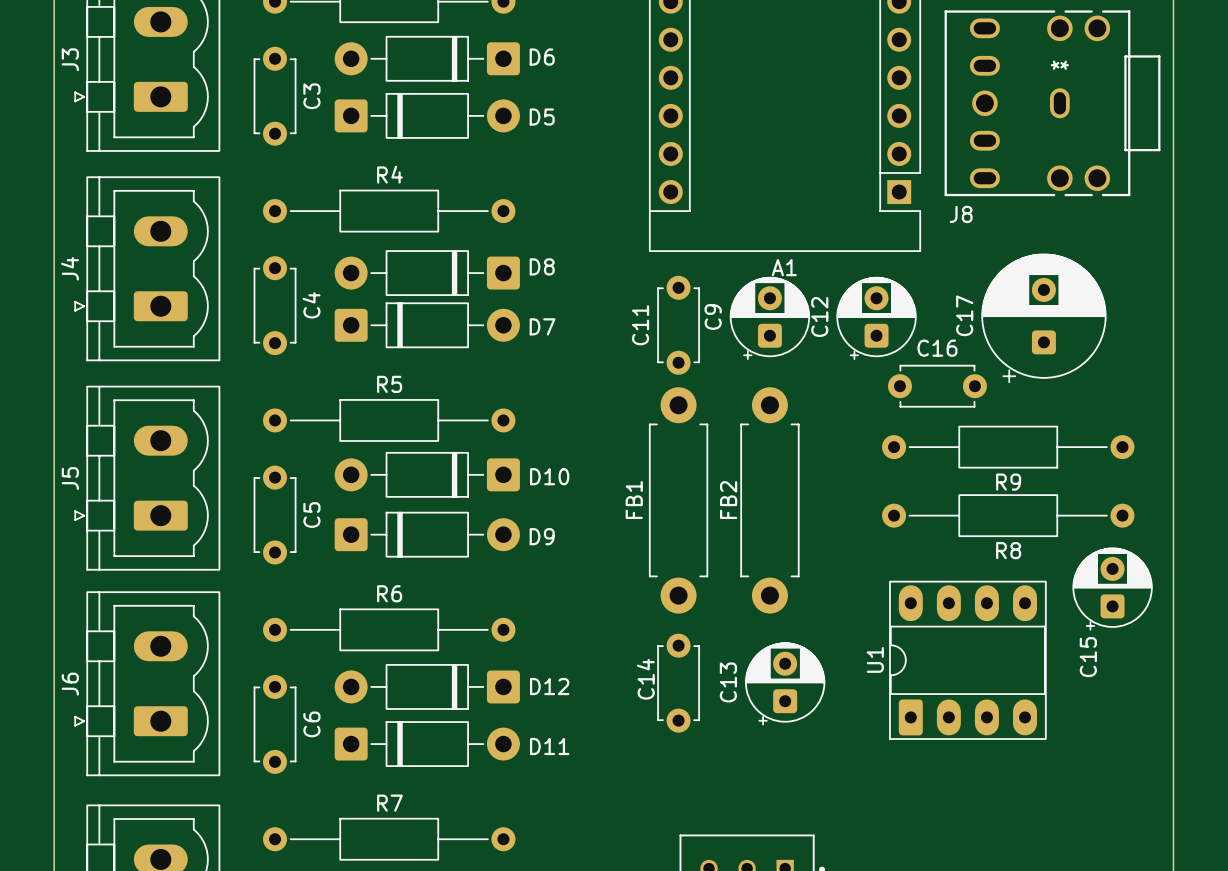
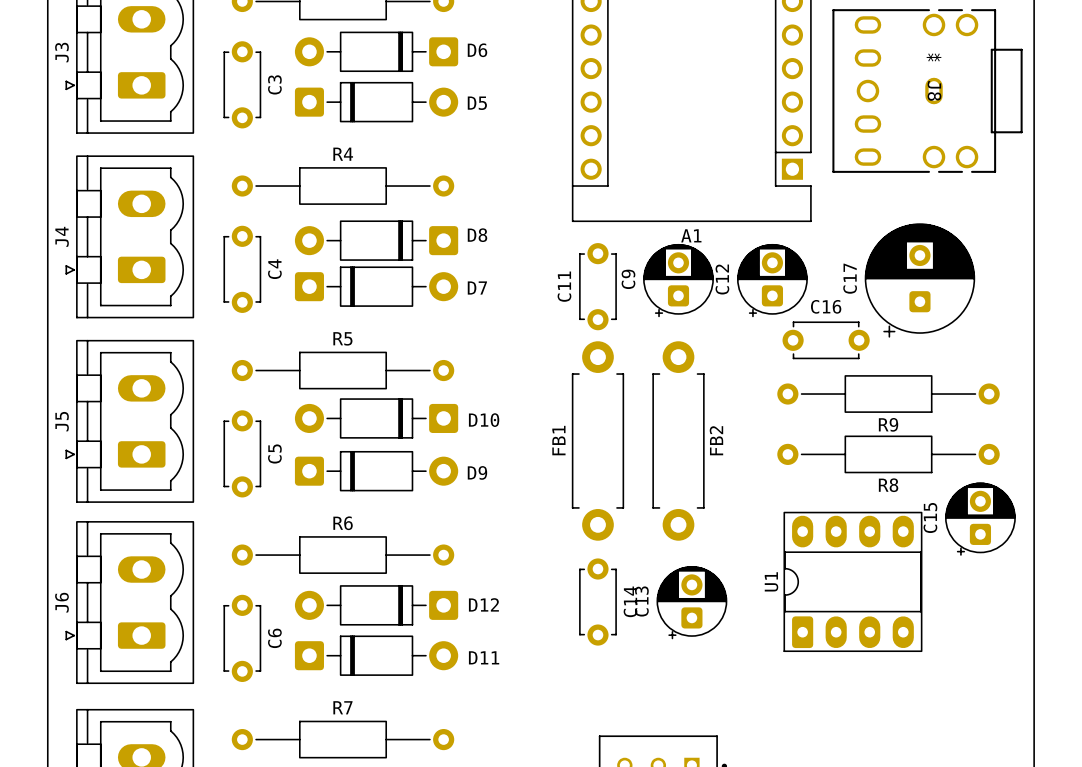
J8 name rotation: 0° (961, 214) -> 90° clockwise (934, 90)
J8 name position: J8 (961, 214) -> J8 (934, 90)
FB2 name position: FB2 (728, 500) -> FB2 (716, 440)
C15 name position: C15 (1088, 657) -> C15 (930, 517)
C14 name position: C14 (645, 679) -> C14 (630, 601)

